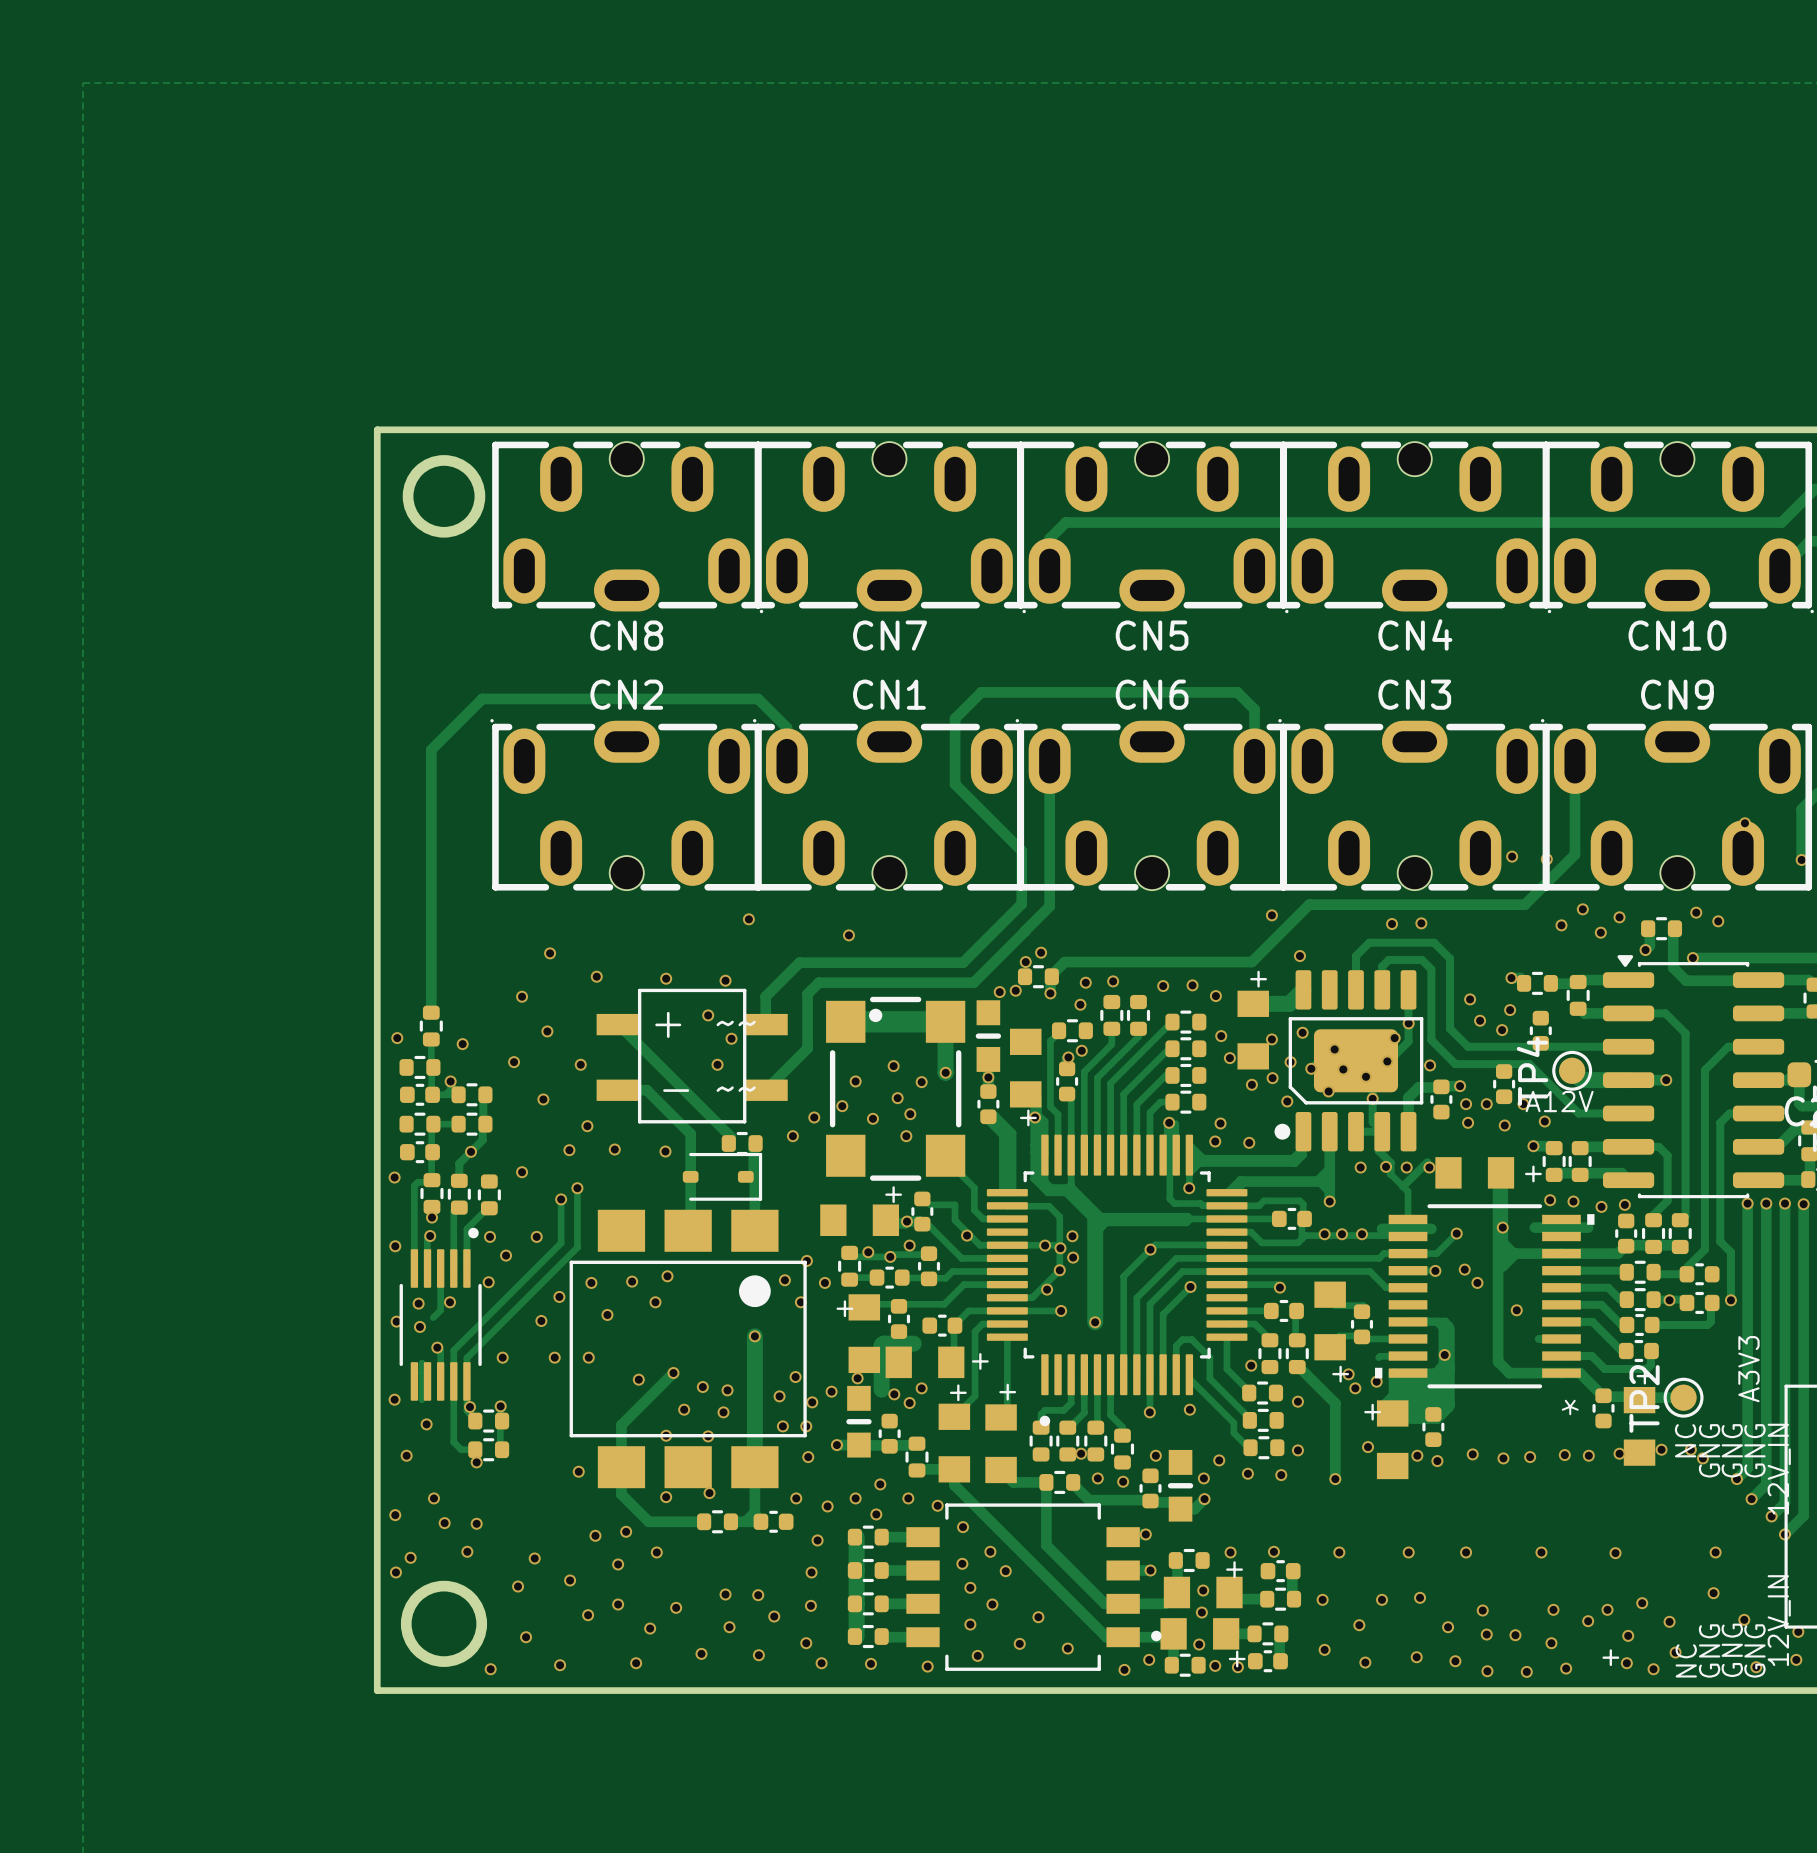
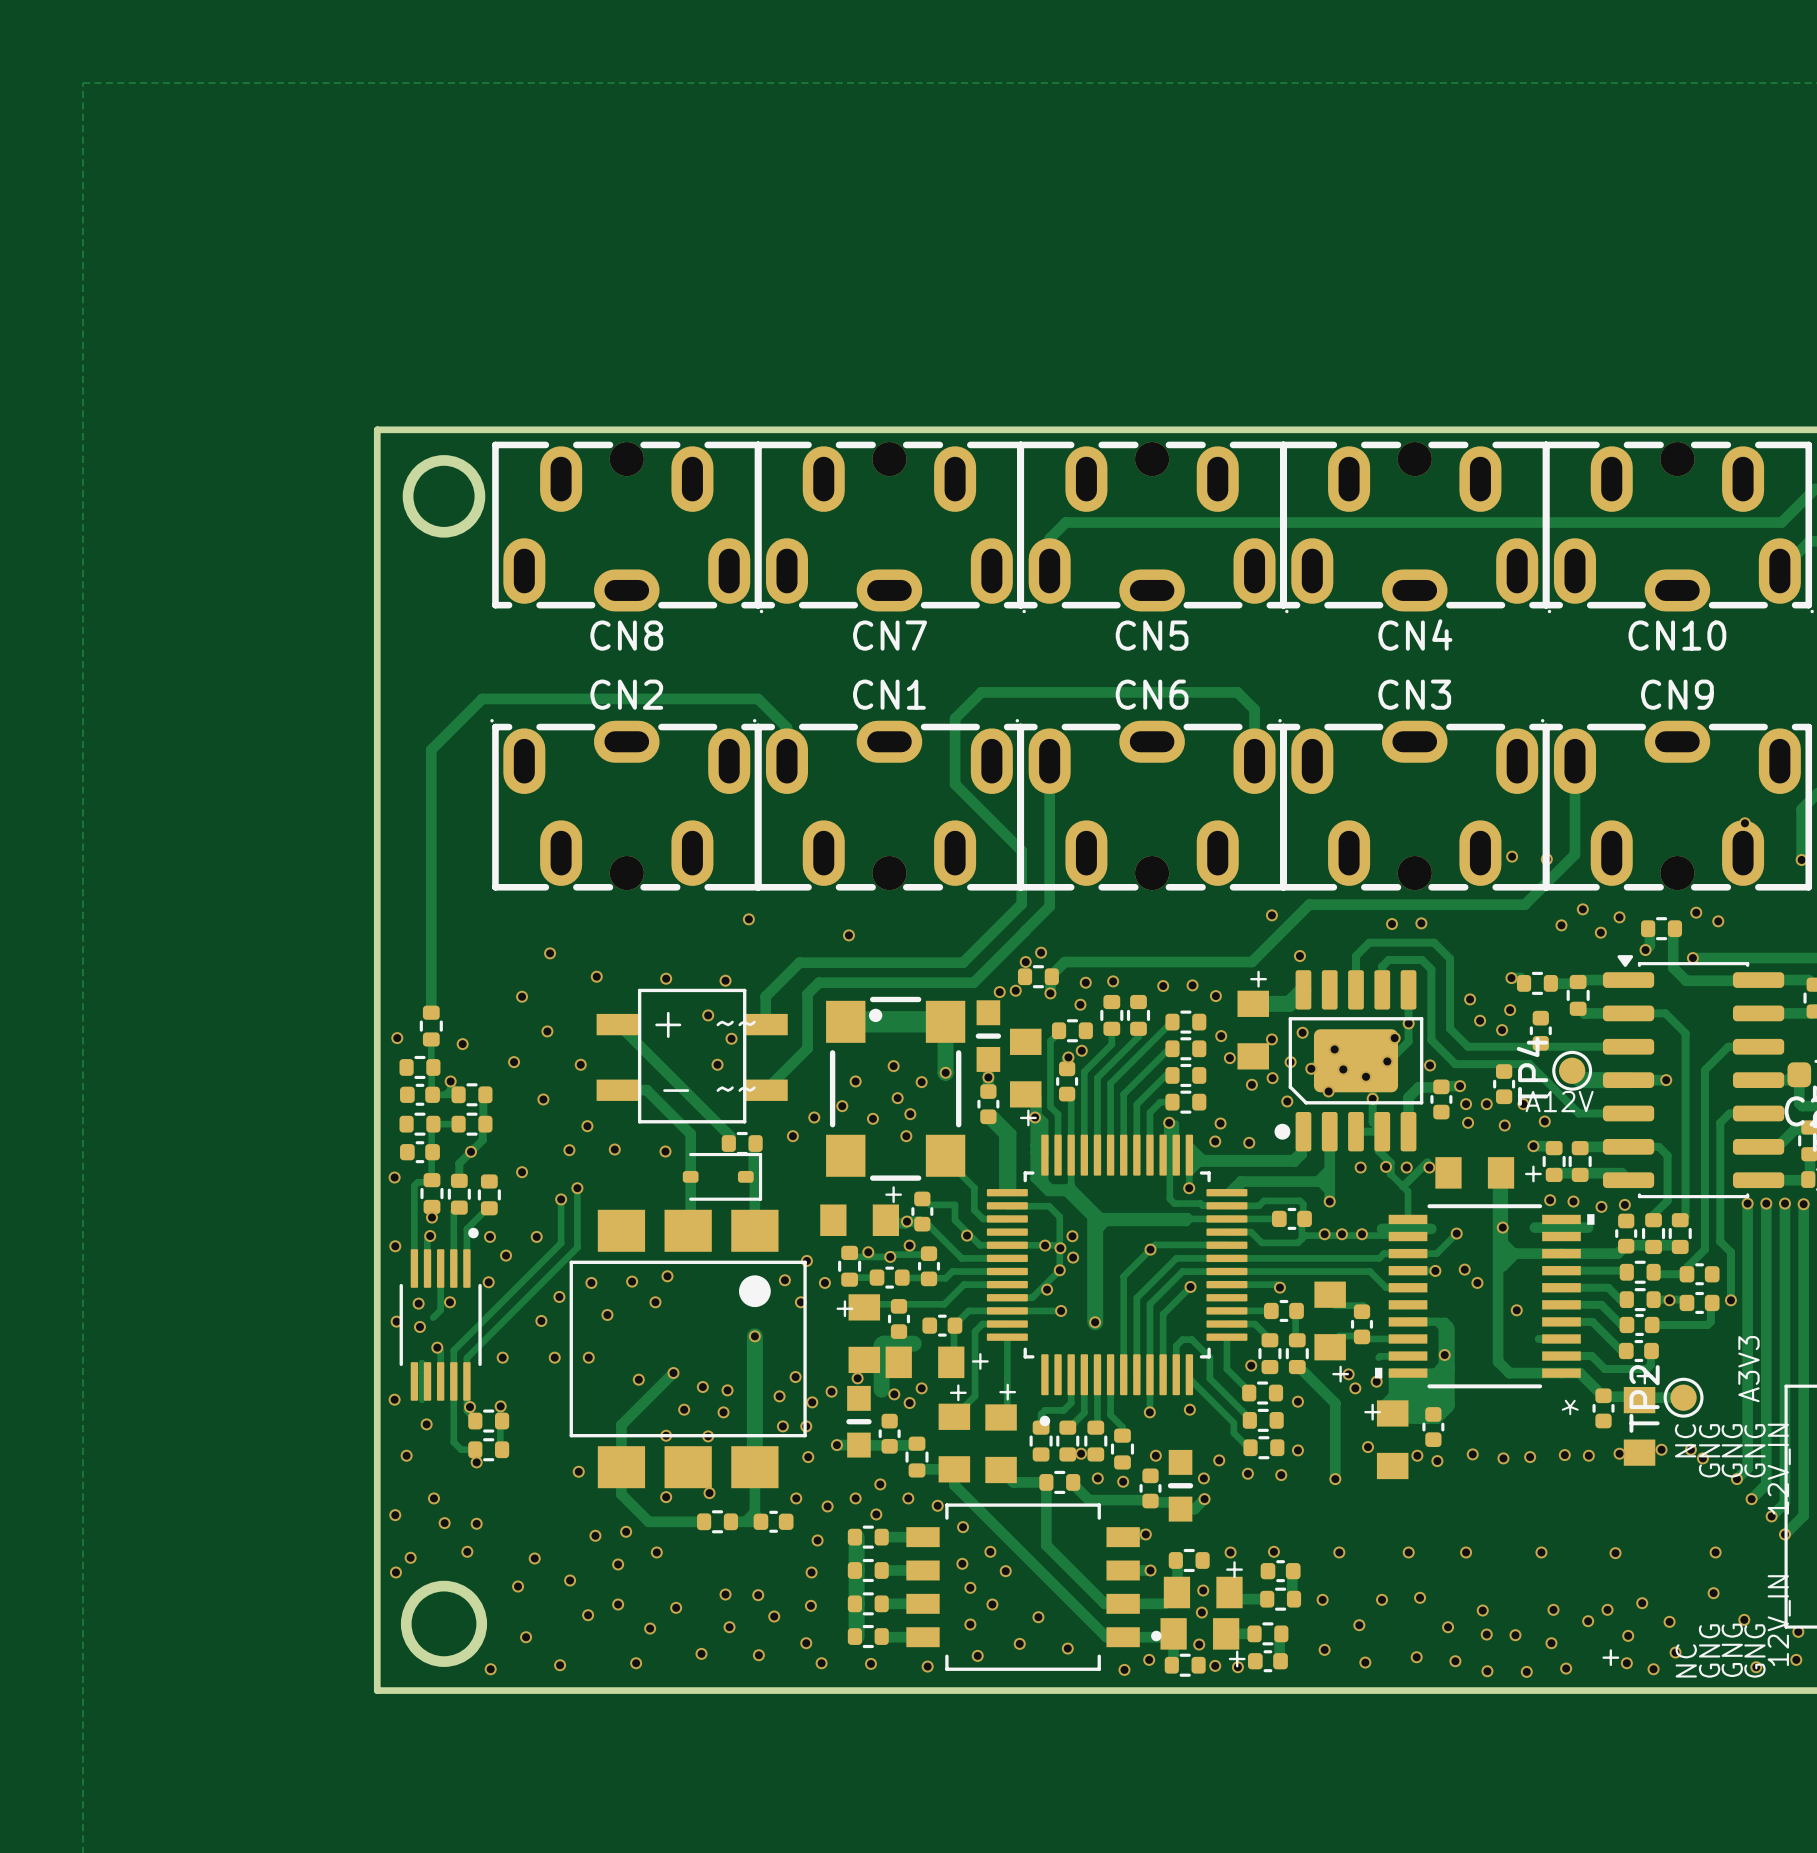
CN2 footprint: [492, 441, 764, 614] -> [492, 441, 764, 614]
CN1 footprint: [754, 441, 1026, 614] -> [754, 441, 1026, 614]
CN6 footprint: [1017, 441, 1289, 614] -> [1017, 441, 1289, 614]
CN3 footprint: [1280, 441, 1552, 614] -> [1280, 441, 1552, 614]
CN9 footprint: [1542, 441, 1814, 614] -> [1542, 441, 1814, 614]
CN8 footprint: [490, 719, 762, 891] -> [490, 719, 762, 891]
CN7 footprint: [753, 719, 1025, 891] -> [753, 719, 1025, 891]
CN5 footprint: [1015, 719, 1287, 891] -> [1015, 719, 1287, 891]
CN4 footprint: [1278, 719, 1550, 891] -> [1278, 719, 1550, 891]
CN10 footprint: [1541, 719, 1813, 891] -> [1541, 719, 1813, 891]

